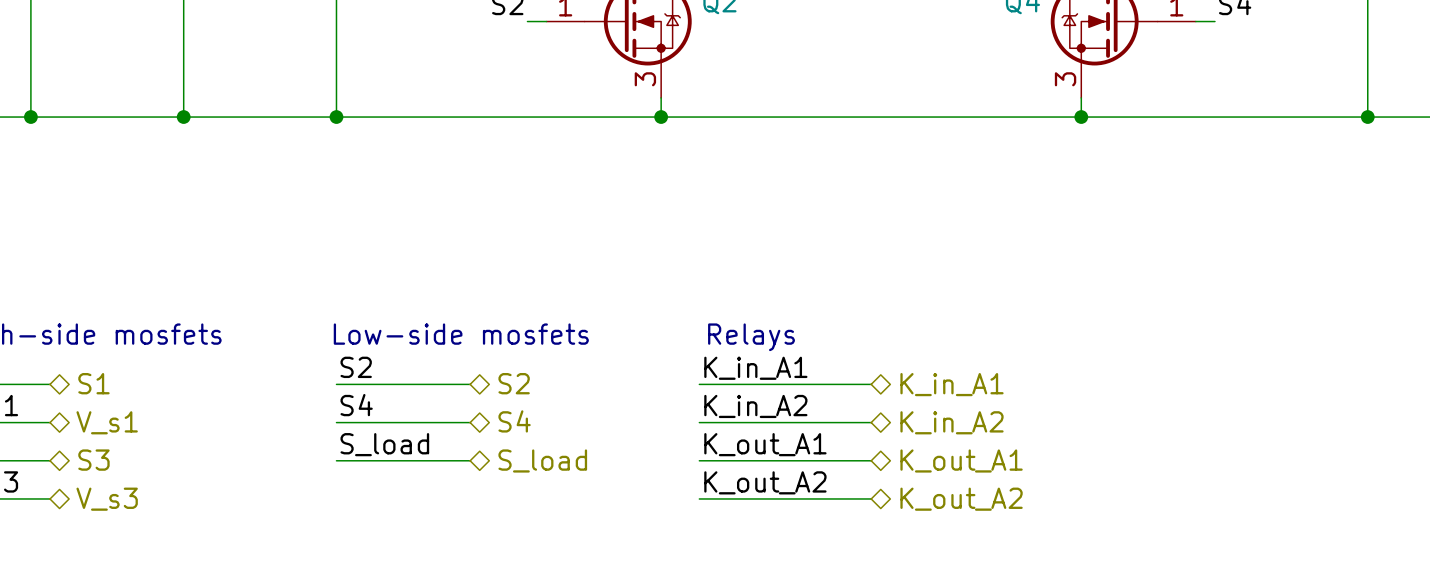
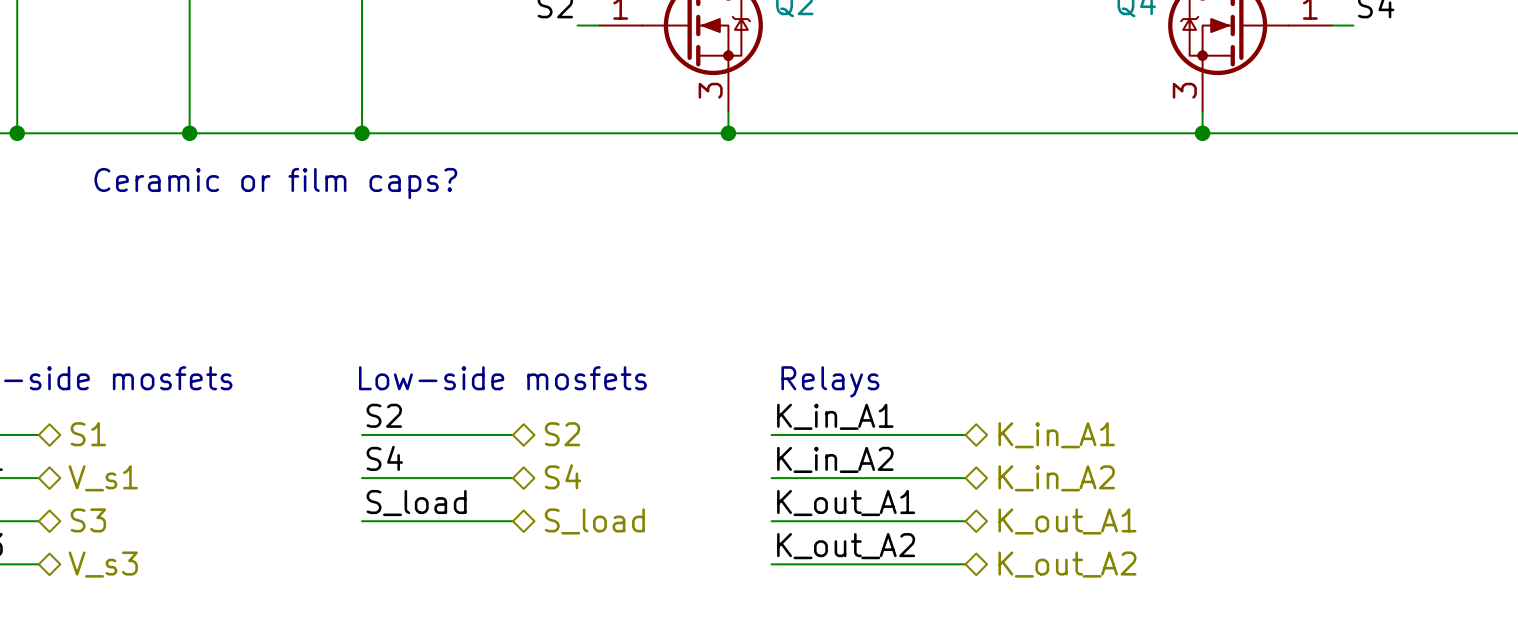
text: none -> Ceramic or film caps? (275, 183)

